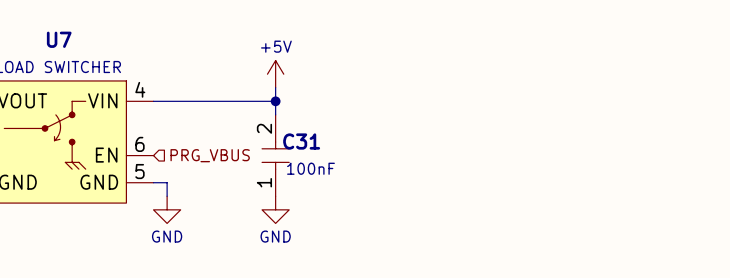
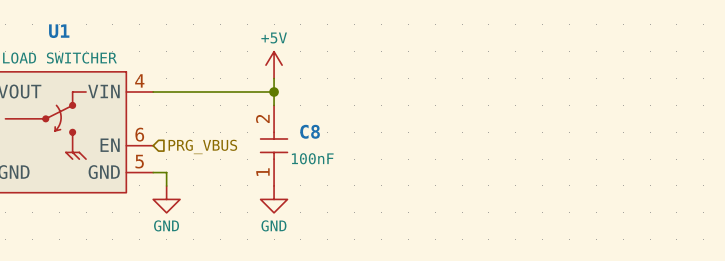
U7 name: U7 (59, 39) -> U1 (59, 31)
C31 name: C31 (301, 141) -> C8 (310, 131)

